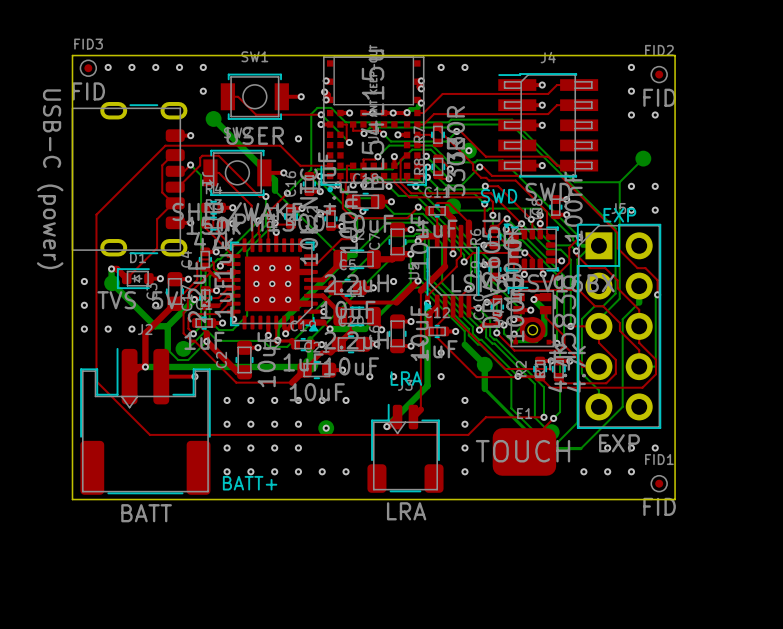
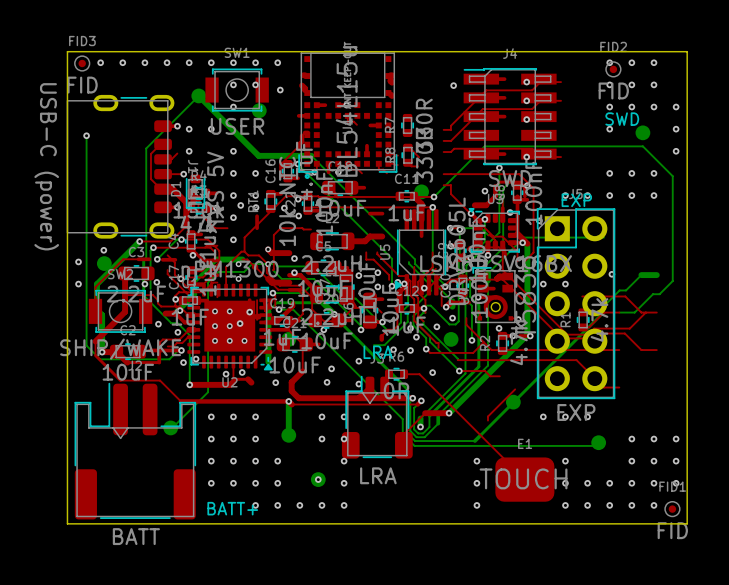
board edge: (675, 55) (675, 499) (72, 499) -> (628, 51) (687, 51) (687, 523) (67, 523) (67, 464)
via: none -> (211, 62)
via: none -> (233, 62)
via: none -> (255, 62)
via: none -> (277, 62)
via: (441, 67) -> none
via: (464, 67) -> none
via: (631, 67) -> none
via: none -> (609, 62)
via: none -> (631, 62)
via: none -> (653, 62)
via: (326, 80) -> none
via: (421, 80) -> none
via: (542, 85) -> none
top track: (579, 85) (557, 85) (548, 93) (442, 93) (423, 113) (417, 113) -> none
via: (421, 88) -> none
via: none -> (526, 82)
top track: none -> (561, 82) (540, 82) (532, 90) (486, 90) (450, 125) (450, 129) (443, 129)
via: (203, 91) -> none
via: none -> (233, 84)
via: none -> (255, 84)
via: (631, 91) -> none
via: none -> (609, 84)
via: none -> (631, 84)
via: none -> (653, 84)
via: (324, 92) -> none
via: none -> (453, 85)
top track: (227, 96) (238, 96) (256, 114) (321, 114) -> none
top track: (281, 96) (301, 96) -> none
via: (326, 99) -> none
bottom track: (421, 103) (416, 109) (410, 109) (407, 112) -> none
via: (421, 103) -> none
via: (542, 105) -> none
top track: (579, 105) (557, 105) (548, 114) (434, 114) (423, 124) (417, 124) -> none
via: none -> (526, 100)
top track: none -> (561, 100) (540, 100) (532, 109) (482, 109) (450, 140) (443, 140)
via: (407, 112) -> none
via: (349, 113) -> none
top track: (384, 113) (407, 113) -> none
via: (393, 113) -> none
bottom track: (321, 114) (349, 142) -> none
via: (321, 114) -> none
via: none -> (233, 107)
via: (631, 115) -> none
via: none -> (631, 107)
via: none -> (653, 107)
via: none -> (676, 107)
bottom track: (213, 118) (275, 180) (275, 190) (344, 259) -> none
part position: (213, 118) -> (198, 95)
part: none -> (259, 110)
via: (321, 124) -> none
top track: (340, 124) (346, 124) (346, 139) (349, 142) -> none
top track: (353, 124) (353, 130) (361, 130) (364, 133) -> none
via: (542, 125) -> none
top track: (437, 126) (437, 129) (473, 164) (473, 169) (481, 177) (486, 177) (489, 180) (515, 180) (547, 211) (547, 233) (550, 237) -> none
via: none -> (526, 119)
top track: (456, 131) (460, 131) (485, 156) (548, 156) (557, 165) (579, 165) -> none
bottom track: (456, 131) (446, 141) (390, 141) (383, 134) -> none
via: (456, 131) -> none
bottom track: (364, 133) (370, 127) (448, 127) (452, 124) (511, 124) (615, 228) (615, 293) (603, 306) (594, 306) (581, 319) (581, 373) (598, 390) (598, 406) -> none
via: (364, 133) -> none
via: (383, 134) -> none
via: (397, 134) -> none
top track: (417, 134) (429, 134) (437, 142) -> none
via: none -> (189, 129)
via: none -> (211, 129)
via: (298, 138) -> none
via: none -> (609, 129)
via: none -> (676, 129)
top track: none -> (307, 132) (302, 135) (302, 141) (299, 146) (281, 163) (281, 175)
via: (349, 142) -> none
bottom track: none -> (86, 135) (86, 345) (100, 359) (169, 359) (179, 349)
via: none -> (86, 135)
top track: (417, 145) (423, 145) (423, 153) (426, 156) -> none
part: (468, 150) -> none
via: (468, 150) -> none
top track: (407, 155) (400, 159) (400, 182) (411, 193) (491, 193) (521, 223) (521, 231) (524, 234) -> none
top track: (377, 156) (375, 159) (363, 159) (363, 165) -> none
bottom track: (377, 156) (389, 145) (432, 145) (449, 162) (502, 160) (579, 237) -> none
via: (377, 156) -> none
via: (394, 156) -> none
bottom track: (426, 156) (448, 178) -> none
via: (426, 156) -> none
bottom track: (643, 158) (619, 182) -> none
part position: (643, 158) -> (642, 132)
via: none -> (189, 151)
via: none -> (233, 151)
via: none -> (676, 151)
top track: none -> (443, 152) (450, 152) (454, 148) (532, 148) (540, 157) (561, 157)
bottom track: (190, 164) (201, 175) (201, 326) (193, 333) -> none
via: (190, 164) -> none
top track: (330, 165) (300, 165) (280, 145) (165, 145) (96, 214) (96, 381) (149, 434) (468, 434) (485, 417) (544, 417) -> none
top track: (353, 165) (346, 165) (345, 190) (342, 193) (342, 208) (352, 218) (407, 218) (418, 207) -> none
via: (542, 165) -> none
via: (427, 167) -> none
top track: (479, 167) (483, 167) (492, 175) (560, 175) (617, 233) (617, 248) (637, 268) (645, 268) (657, 280) (657, 294) -> none
bottom track: (479, 167) (461, 185) (445, 185) (427, 167) -> none
via: (479, 167) -> none
via: none -> (526, 157)
bottom track: (450, 169) (430, 149) (412, 149) (392, 169) (317, 169) (313, 173) (313, 179) (318, 184) (323, 184) (357, 218) -> none
via: (450, 169) -> none
top track: (210, 172) (218, 172) (251, 205) (252, 245) -> none
SW2 position: (237, 172) -> (120, 311)
top track: (264, 172) (283, 172) -> none
via: (283, 172) -> none
top track: (394, 176) (394, 182) (409, 197) (488, 197) (492, 201) (492, 215) -> none
bottom track: (427, 177) (439, 189) (482, 189) (485, 186) -> none
via: (427, 177) -> none
via: (449, 178) -> none
bottom track: none -> (300, 167) (392, 258) (392, 286)
bottom track: none -> (499, 167) (499, 232) (466, 265) (466, 300) (471, 305) (471, 340)
via: none -> (499, 167)
bottom track: (619, 182) (619, 298) (598, 319) (598, 326) -> none
bottom track: (619, 182) (574, 182) (512, 119) (451, 119) (448, 122) (345, 122) (331, 107) (317, 107) (311, 114) (311, 169) (287, 193) -> none
bottom track: (338, 185) (351, 198) (378, 198) (394, 213) (422, 213) (464, 255) (464, 261) -> none
via: (353, 185) -> none
bottom track: (363, 185) (369, 179) (418, 179) (432, 193) (474, 193) (484, 203) -> none
via: none -> (233, 173)
via: none -> (255, 173)
bottom track: (388, 186) (398, 195) (416, 195) (475, 254) (475, 271) (496, 293) (496, 332) -> none
via: (388, 186) -> none
bottom track: (415, 186) (491, 262) (491, 280) (520, 309) (520, 327) (514, 334) -> none
via: (415, 186) -> none
top track: (485, 186) (498, 186) (532, 220) (532, 234) -> none
via: (485, 186) -> none
via: (631, 186) -> none
via: none -> (631, 173)
via: none -> (653, 173)
top track: (178, 187) (200, 165) (200, 157) (202, 155) (218, 155) (259, 196) (265, 196) -> (165, 174) (183, 174)
via: none -> (183, 174)
top track: none -> (443, 174) (519, 174) (533, 188) (533, 252) (524, 261)
via: (320, 191) -> none
top track: (287, 193) (268, 212) (268, 245) -> none
via: (287, 193) -> none
bottom track: none -> (511, 180) (503, 188) (503, 247) (470, 280) (470, 296) (478, 305) (478, 366) (429, 416) (429, 427) (423, 433) (418, 433) (414, 429) (414, 408) (421, 400)
bottom track: (265, 196) (265, 225) (233, 257) (233, 319) -> none
via: (265, 196) -> none
text position: SWD (499, 196) -> SWD (622, 119)
top track: none -> (443, 185) (450, 185) (450, 194) (493, 236) (502, 236) (517, 251) (517, 261)
via: (391, 201) -> none
top track: (173, 203) (157, 219) (157, 248) (126, 278) (117, 268) (111, 268) -> none
top track: none -> (163, 189) (173, 189) (186, 202) (186, 226) (170, 241) (139, 241)
top track: (484, 203) (484, 232) (489, 237) (499, 237) (507, 245) (513, 245) -> none
via: (484, 203) -> none
via: none -> (484, 191)
bottom track: (453, 206) (457, 210) (543, 208) (576, 243) (591, 245) -> none
via: (232, 207) -> none
bottom track: (418, 207) (422, 207) (470, 256) (470, 286) (468, 288) -> none
via: (418, 207) -> none
via: (302, 208) -> none
via: none -> (233, 195)
via: none -> (255, 195)
top track: none -> (517, 196) (517, 233) (527, 243)
top track: none -> (524, 196) (524, 186) (520, 182) (499, 182) (495, 186) (495, 196) (486, 205) (474, 205)
via: none -> (565, 195)
via: none -> (631, 195)
via: none -> (653, 195)
via: (362, 211) -> none
top track: none -> (434, 196) (285, 196) (244, 237) (244, 251)
bottom track: none -> (434, 196) (484, 146) (642, 146) (672, 176) (672, 281) (659, 294) (653, 294) (634, 312) (619, 312)
via: none -> (434, 196)
via: (566, 214) -> none
bottom track: (492, 215) (492, 225) (507, 240) (522, 240) (557, 274) (557, 343) -> none
via: (492, 215) -> none
via: (540, 215) -> none
bottom track: (357, 218) (416, 218) (442, 243) (442, 283) (486, 327) (486, 337) (534, 383) (534, 417) (551, 432) -> none
bottom track: (357, 218) (357, 236) (354, 239) -> none
top track: (507, 218) (494, 229) -> none
bottom track: (507, 218) (564, 275) (564, 346) (560, 350) (560, 411) (553, 418) -> none
via: (507, 218) -> none
bottom track: (531, 219) (531, 224) (552, 245) (570, 245) (576, 251) -> none
via: (531, 219) -> none
top track: (258, 220) (258, 232) -> none
bottom track: (258, 220) (205, 271) (205, 331) -> none
top track: none -> (310, 207) (432, 207)
bottom track: none -> (432, 207) (432, 272) (445, 285)
via: none -> (432, 207)
top track: (205, 223) (205, 228) (233, 256) -> (167, 270) (167, 274) (193, 300)
top track: (275, 223) (291, 224) -> none
bottom track: (275, 223) (247, 251) (247, 315) (232, 330) (219, 330) (209, 320) (209, 276) (220, 265) -> none
via: none -> (284, 208)
bottom track: (521, 223) (547, 249) (560, 249) (570, 259) (570, 326) -> none
via: (521, 223) -> none
via: (540, 223) -> none
via: (341, 226) -> none
via: none -> (510, 212)
via: (411, 229) -> none
via: (276, 232) -> none
via: none -> (298, 215)
via: none -> (233, 217)
top track: (258, 233) (259, 239) -> none
bottom track: none -> (484, 219) (484, 241) (462, 263) (462, 301) (465, 304) (465, 373) (420, 418) (420, 426)
via: none -> (484, 219)
top track: (445, 236) (445, 266) (420, 290) (420, 409) (413, 417) -> none
top track: (460, 236) (460, 255) (456, 259) (456, 266) (427, 295) (427, 303) -> none
top track: (468, 236) (468, 222) (449, 202) (437, 202) (429, 210) (437, 218) (437, 236) (423, 236) (418, 241) -> none
R6 rotation: 0° (494, 237) -> 90° clockwise (396, 374)
R6 position: (494, 237) -> (396, 374)
top track: (579, 237) (569, 247) (569, 263) (550, 281) (521, 281) (513, 273) (513, 260) -> none
top track: (354, 239) (341, 239) (316, 264) (310, 264) -> none
via: (354, 239) -> none
C7 position: (397, 241) -> (346, 287)
bottom track: (418, 241) (408, 241) (310, 339) (310, 364) (308, 366) (145, 366) -> none
via: (418, 241) -> none
bottom track: (591, 245) (577, 259) (577, 422) (556, 443) (546, 443) (511, 408) (511, 375) (468, 335) (468, 329) (420, 280) (418, 280) -> none
top track: none -> (310, 229) (280, 228) (273, 235) (273, 270)
bottom track: none -> (459, 229) (458, 321) (455, 324) (449, 324) (430, 305) (423, 305) (413, 316) (413, 325) (426, 338) (426, 349)
via: none -> (459, 229)
via: (216, 251) -> none
top track: (576, 251) (576, 254) (589, 268) (605, 268) (617, 280) (617, 288) (639, 309) (639, 342) (655, 359) (655, 374) (642, 387) (550, 387) (539, 376) (517, 376) -> none
via: (576, 251) -> none
top track: (513, 252) (473, 252) (464, 261) -> none
via: (524, 252) -> none
via: (453, 253) -> none
bottom track: (410, 254) (410, 283) -> none
via: (410, 254) -> none
bottom track: none -> (603, 237) (523, 237) (487, 273) (487, 365) (438, 415) (438, 423) (424, 437) (416, 437) (410, 430) (410, 400) (412, 398)
top track: none -> (181, 239) (208, 239) (219, 250) (219, 262) (211, 270) (211, 290)
bottom track: none -> (181, 239) (177, 239) (157, 259)
via: none -> (181, 239)
via: none -> (233, 239)
bottom track: none -> (139, 241) (96, 284) (96, 309) (102, 315) (102, 352)
via: none -> (139, 241)
top track: (340, 259) (340, 262) (322, 279) (310, 279) -> (293, 303) (293, 306) (276, 322) (265, 322)
via: (464, 261) -> none
bottom track: none -> (527, 243) (527, 334) (449, 413)
via: (220, 265) -> none
top track: none -> (153, 247) (210, 247) (215, 252) (215, 257) (202, 269) (198, 269)
bottom track: none -> (153, 247) (150, 250) (150, 288)
via: none -> (153, 247)
bottom track: (111, 268) (111, 282) (155, 326) (167, 326) -> none
via: (256, 268) -> none
via: (272, 268) -> none
top track: none -> (244, 251) (248, 255) (259, 255) (266, 263) (266, 272) (279, 285) (300, 285) (312, 297) (312, 309) (323, 321) (339, 321) (353, 307) (377, 307) (381, 312)
top track: none -> (244, 251) (241, 251) (226, 267) (226, 290)
top track: (233, 271) (217, 272) (210, 259) (200, 259) (197, 262) (197, 279) (145, 333) (145, 366) (139, 366) (129, 376) -> none
top track: none -> (366, 252) (366, 259) (373, 259) (389, 275) (389, 279)
top track: none -> (377, 252) (399, 276) (405, 276) (410, 281) (410, 295) (414, 299) (414, 320) (436, 342) (438, 342) (438, 347)
top track: none -> (432, 252) (432, 267) (418, 281) (418, 292) (425, 299) (425, 312)
top track: (210, 272) (188, 294) (187, 308) (183, 312) (183, 333) (191, 341) (194, 341) (236, 382) (292, 382) (322, 352) (330, 352) (350, 332) (350, 302) -> none
via: (543, 273) -> none
top track: none -> (167, 255) (174, 262) (174, 274) (190, 290) (203, 290)
via: none -> (192, 255)
via: none -> (294, 258)
D1 rotation: 0° (135, 278) -> 90° counterclockwise (195, 191)
D1 position: (135, 278) -> (195, 191)
top track: none -> (138, 259) (123, 259) (95, 287) (95, 311)
via: (160, 278) -> none
via: none -> (157, 259)
top track: none -> (242, 259) (247, 259) (278, 289) (297, 289) (302, 294) (302, 314) (287, 329)
bottom track: none -> (242, 259) (216, 259) (194, 282) (194, 294) (175, 313)
via: (188, 279) -> none
top track: (418, 280) (396, 302) (350, 302) (335, 287) (310, 287) -> none
via: (418, 280) -> none
via: (393, 281) -> none
bottom track: none -> (408, 262) (430, 285) (430, 290) (407, 313) (407, 321) (384, 345) (373, 345)
via: (272, 283) -> none
bottom track: (410, 283) (414, 287) (421, 287) (464, 331) (464, 344) (484, 364) (484, 388) (544, 448) (581, 448) (622, 406) (622, 319) (639, 302) (639, 286) -> none
bottom track: (410, 283) (365, 328) (330, 328) -> none
U2 position: (272, 284) -> (230, 327)
via: (373, 287) -> none
via: (468, 288) -> none
via: (216, 290) -> none
bottom track: none -> (273, 270) (281, 278) (314, 278) (361, 325) (361, 329)
C3 rotation: 0° (174, 291) -> 90° clockwise (136, 273)
C3 position: (174, 291) -> (136, 273)
top track: none -> (125, 273) (125, 311) (95, 341) (95, 355) (120, 380) (160, 380) (180, 401) (288, 401) (291, 404) (417, 404) (421, 400)
via: none -> (294, 272)
via: none -> (377, 272)
bottom track: (657, 294) (655, 296) (655, 366) (639, 366) -> none
bottom track: none -> (656, 275) (641, 275) (626, 290) (619, 290) (603, 307) (603, 312) (474, 441) (415, 441) (406, 432) (406, 388) (322, 302) (277, 302) (268, 311) (268, 362)
via: none -> (358, 275)
top track: (519, 297) (519, 289) (578, 289) (595, 306) (603, 306) (619, 323) (619, 330) (639, 350) (639, 366) -> none
bottom track: (194, 299) (167, 326) -> none
via: (272, 299) -> none
via: (288, 299) -> none
bottom track: (533, 299) (544, 309) (544, 334) (536, 341) (512, 341) (504, 333) (504, 325) -> none
via: (533, 299) -> none
via: (486, 302) -> none
via: none -> (156, 282)
bottom track: (427, 303) (427, 385) (386, 426) -> none
bottom track: none -> (404, 283) (408, 287) (408, 305) (400, 312) (400, 322) (393, 330) (387, 330) (355, 298) (345, 298) (313, 266) (252, 264) (244, 271) (218, 271) (208, 282) (208, 392) (170, 427)
via: none -> (404, 283)
via: none -> (543, 284)
via: none -> (565, 284)
bottom track: none -> (311, 285) (303, 293) (272, 293)
top track: (453, 306) (453, 316) (505, 369) (550, 369) (564, 383) (606, 383) (615, 373) (615, 359) (598, 342) (598, 326) (570, 326) -> none
via: none -> (392, 286)
via: none -> (377, 286)
bottom track: (478, 308) (490, 319) (490, 335) (544, 387) (544, 417) -> none
top track: none -> (424, 288) (428, 288) (469, 247) (498, 247) (502, 251) (502, 270) (567, 334) (588, 334) (594, 328) (629, 328) (645, 312)
via: none -> (424, 288)
via: (530, 310) -> none
top track: (545, 310) (545, 317) (564, 336) (564, 345) -> none
via: (323, 311) -> none
top track: none -> (272, 293) (275, 295) (275, 307) (279, 309)
via: none -> (272, 293)
top track: (445, 315) (437, 325) (437, 337) (476, 377) (540, 377) -> (414, 294) (418, 297) (418, 316) (423, 321)
top track: none -> (125, 295) (152, 295) (161, 306) (179, 306) (188, 315) (193, 315)
top track: none -> (582, 296) (625, 296) (641, 312) (656, 312)
via: (233, 319) -> none
via: none -> (175, 299)
via: (411, 321) -> none
top track: (300, 322) (323, 322) (330, 328) -> none
top track: (196, 323) (206, 333) (206, 341) (237, 372) (244, 372) -> none
via: (222, 323) -> none
via: (504, 325) -> none
bottom track: (167, 326) (167, 349) (178, 360) (188, 360) (206, 341) -> none
via: (570, 326) -> none
via: (330, 328) -> none
top track: none -> (441, 306) (441, 288) (450, 279) (502, 279) (561, 338) (597, 338) (602, 333) (624, 333) (641, 350) (656, 350)
via: (84, 329) -> none
via: (108, 329) -> none
via: (131, 329) -> none
via: (381, 329) -> none
bottom track: none -> (452, 306) (452, 301) (415, 263) (415, 259) (311, 155) (258, 155) (198, 95) (146, 148) (146, 258) (143, 260) (143, 295) (171, 323) (177, 323) (189, 335) (189, 384)
top track: none -> (396, 307) (397, 326) (392, 330) (387, 330) (381, 336) (381, 339)
bottom track: (479, 330) (479, 327) (428, 275) (428, 236) (414, 222) (387, 222) (354, 254) (349, 254) (277, 326) (277, 340) -> none
bottom track: (205, 331) (217, 340) (263, 340) (269, 346) (287, 346) (312, 321) (312, 312) (389, 236) (413, 236) (420, 233) (424, 238) (424, 278) (472, 326) (472, 333) (517, 376) -> none
bottom track: (205, 331) (187, 348) (183, 348) -> none
bottom track: none -> (279, 309) (293, 309) (402, 419) (402, 434) (414, 445) (595, 445) (598, 442)
via: none -> (279, 309)
top track: (496, 332) (514, 350) (559, 350) (564, 345) -> none
via: (496, 332) -> none
via: (285, 333) -> none
via: none -> (215, 311)
via: none -> (229, 311)
via: (514, 334) -> none
top track: none -> (619, 312) (603, 312) (589, 327) (583, 327)
bottom track: none -> (425, 312) (417, 318) (417, 323) (430, 336) (430, 341) (459, 371)
top track: none -> (165, 313) (175, 313) (184, 322) (193, 322)
via: none -> (334, 314)
via: (277, 340) -> none
via: (206, 341) -> none
top track: (276, 341) (291, 341) (295, 344) -> (233, 379) (248, 379) (251, 382)
via: none -> (452, 318)
top track: none -> (466, 318) (466, 324) (491, 350) (619, 350)
via: (321, 344) -> none
via: (376, 344) -> none
bottom track: none -> (423, 321) (423, 324) (457, 360)
top track: (564, 345) (582, 363) (582, 366) (598, 366) -> none
via: none -> (158, 324)
part: (183, 348) -> none
via: none -> (215, 326)
via: none -> (229, 326)
via: none -> (436, 326)
via: none -> (499, 328)
top track: none -> (193, 329) (189, 329) (179, 339) (162, 339) (159, 343) (159, 362) (127, 362) (116, 351) (102, 352)
top track: none -> (265, 329) (288, 329) (302, 344) (302, 371) (291, 382) (291, 391) (298, 398) (412, 398)
via: none -> (323, 329)
via: none -> (361, 329)
via: none -> (177, 332)
C2 rotation: 0° (244, 359) -> 90° clockwise (127, 351)
C2 position: (244, 359) -> (127, 351)
top track: none -> (193, 337) (188, 337) (182, 343) (176, 343) (173, 346) (167, 346)
via: none -> (416, 337)
via: none -> (471, 340)
via: (145, 366) -> none
via: none -> (215, 340)
via: none -> (229, 340)
via: none -> (244, 340)
top track: none -> (483, 342) (473, 352) (430, 352) (426, 349)
R1 position: (558, 369) -> (583, 319)
via: (342, 370) -> none
via: none -> (393, 349)
via: none -> (426, 349)
via: (369, 376) -> none
via: (393, 376) -> none
via: (517, 376) -> none
via: none -> (102, 352)
via: none -> (196, 359)
top track: none -> (457, 360) (576, 360) (603, 387) (619, 387)
via: none -> (358, 361)
via: none -> (183, 362)
top track: none -> (233, 362) (233, 381) (230, 384) (189, 384)
via: none -> (331, 368)
top track: none -> (459, 371) (485, 371) (490, 376) (499, 376)
via: none -> (459, 371)
via: (227, 400) -> none
via: (250, 400) -> none
via: none -> (242, 372)
via: (274, 400) -> none
via: (298, 400) -> none
via: (322, 400) -> none
via: (346, 400) -> none
via: none -> (226, 374)
top track: none -> (404, 374) (419, 374) (524, 479)
via: none -> (327, 382)
via: none -> (275, 382)
via: none -> (358, 384)
via: none -> (189, 384)
via: (544, 417) -> none
via: (553, 418) -> none
J2 position: (145, 421) -> (135, 451)
via: (227, 424) -> none
via: (250, 424) -> none
via: (274, 424) -> none
via: (298, 424) -> none
via: (464, 424) -> none
via: (386, 426) -> none
via: none -> (412, 398)
part position: (326, 428) -> (288, 435)
via: (326, 428) -> none
via: none -> (421, 400)
bottom track: none -> (288, 401) (288, 435)
via: none -> (288, 401)
top track: none -> (449, 413) (425, 413) (399, 438) (399, 447)
via: none -> (449, 413)
via: (298, 448) -> none
via: none -> (321, 416)
via: none -> (344, 416)
via: none -> (366, 416)
via: none -> (388, 416)
via: (464, 448) -> none
via: none -> (543, 416)
via: (655, 448) -> none
E1 position: (524, 451) -> (524, 479)
via: none -> (420, 426)
part: none -> (170, 427)
via: (298, 471) -> none
via: (322, 471) -> none
via: none -> (344, 439)
via: (464, 471) -> none
via: (583, 471) -> none
via: (607, 471) -> none
via: (631, 471) -> none
via: none -> (631, 439)
via: none -> (653, 439)
via: none -> (676, 439)
part: none -> (598, 442)
text position: BATT+ (250, 483) -> BATT+ (232, 508)
FID1 position: (659, 483) -> (672, 509)
via: none -> (211, 461)
via: none -> (233, 461)
via: none -> (255, 461)
via: none -> (277, 461)
via: none -> (344, 461)
via: none -> (476, 461)
via: none -> (565, 461)
via: none -> (631, 461)
via: none -> (653, 461)
via: none -> (676, 461)
part: none -> (318, 479)
via: none -> (318, 479)
via: none -> (211, 483)
via: none -> (233, 483)
via: none -> (255, 483)
via: none -> (277, 483)
via: none -> (344, 483)
via: none -> (476, 483)
via: none -> (565, 483)
via: none -> (587, 483)
via: none -> (609, 483)
via: none -> (631, 483)
via: none -> (653, 483)
via: none -> (676, 483)
via: none -> (255, 505)
via: none -> (277, 505)
via: none -> (299, 505)
via: none -> (321, 505)
via: none -> (344, 505)
via: none -> (476, 505)
via: none -> (565, 505)
via: none -> (587, 505)
via: none -> (609, 505)
via: none -> (631, 505)
via: none -> (653, 505)

